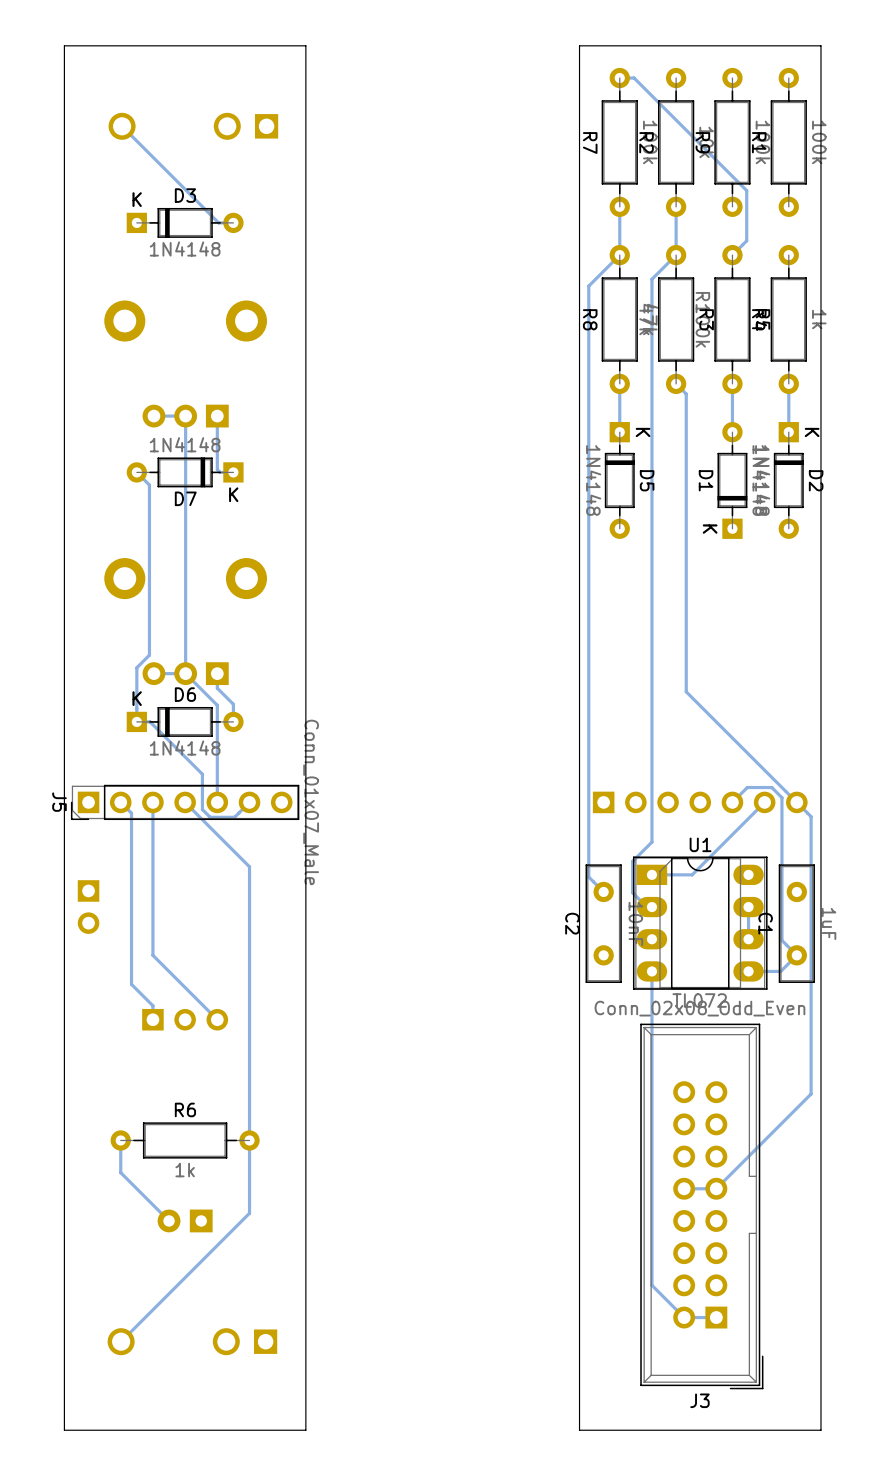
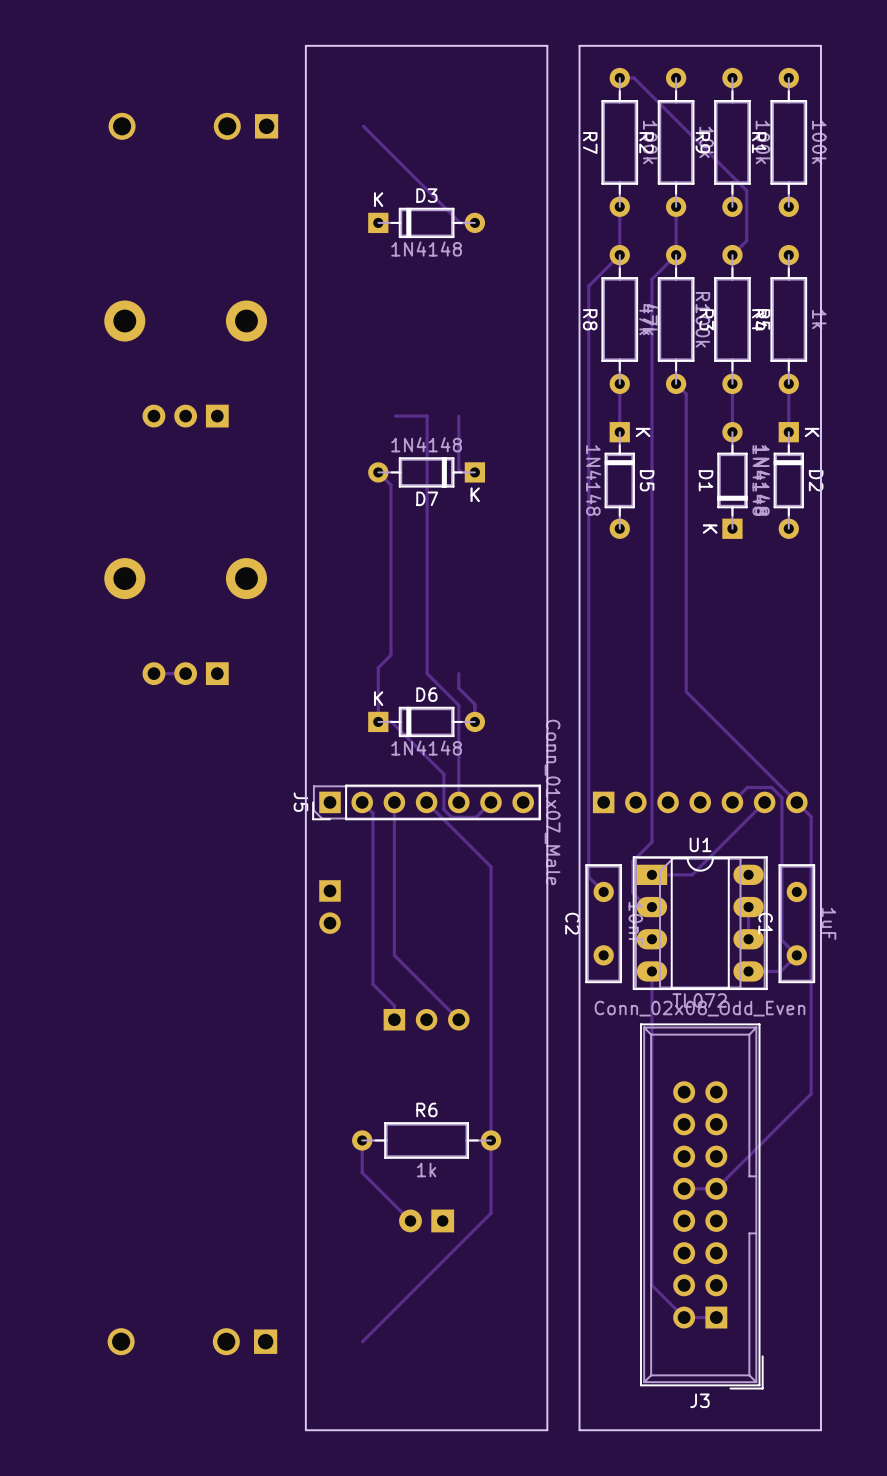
board edge: (305, 45) (64, 45) (64, 1430) (305, 1430) -> (305, 45) (547, 45) (547, 1430) (305, 1430)
track: (122, 126) (218, 222) (233, 222) -> (363, 126) (460, 222) (474, 222)
D3 position: (185, 222) -> (426, 222)
track: (153, 416) (185, 416) (185, 673) (217, 705) (217, 802) -> (395, 416) (427, 416) (427, 673) (458, 705) (458, 802)
track: (217, 416) (217, 469) (220, 472) (233, 472) -> (458, 416) (458, 469) (461, 472) (474, 472)
track: (136, 472) (149, 485) (149, 655) (136, 667) (136, 721) (150, 721) (202, 774) (202, 809) (210, 817) (234, 817) (249, 802) -> (378, 472) (390, 485) (390, 655) (378, 667) (378, 721) (391, 721) (443, 774) (443, 809) (451, 817) (476, 817) (490, 802)
D7 position: (185, 472) -> (426, 472)
track: (217, 673) (217, 688) (233, 704) (233, 721) -> (458, 673) (458, 688) (474, 704) (474, 721)
D6 position: (185, 721) -> (426, 721)
track: (120, 802) (131, 813) (131, 984) (152, 1005) (152, 1019) -> (362, 802) (372, 813) (372, 984) (394, 1005) (394, 1019)
track: (152, 802) (152, 955) (217, 1019) -> (394, 802) (394, 955) (458, 1019)
track: (185, 802) (249, 866) (249, 1213) (121, 1341) -> (426, 802) (490, 866) (490, 1213) (362, 1341)
J5 position: (185, 802) -> (426, 802)
part position: (88, 907) -> (330, 907)
part position: (185, 1019) -> (426, 1019)
track: (120, 1140) (120, 1172) (169, 1220) -> (362, 1140) (362, 1172) (410, 1220)
R6 position: (185, 1140) -> (426, 1140)
part position: (185, 1220) -> (426, 1220)

